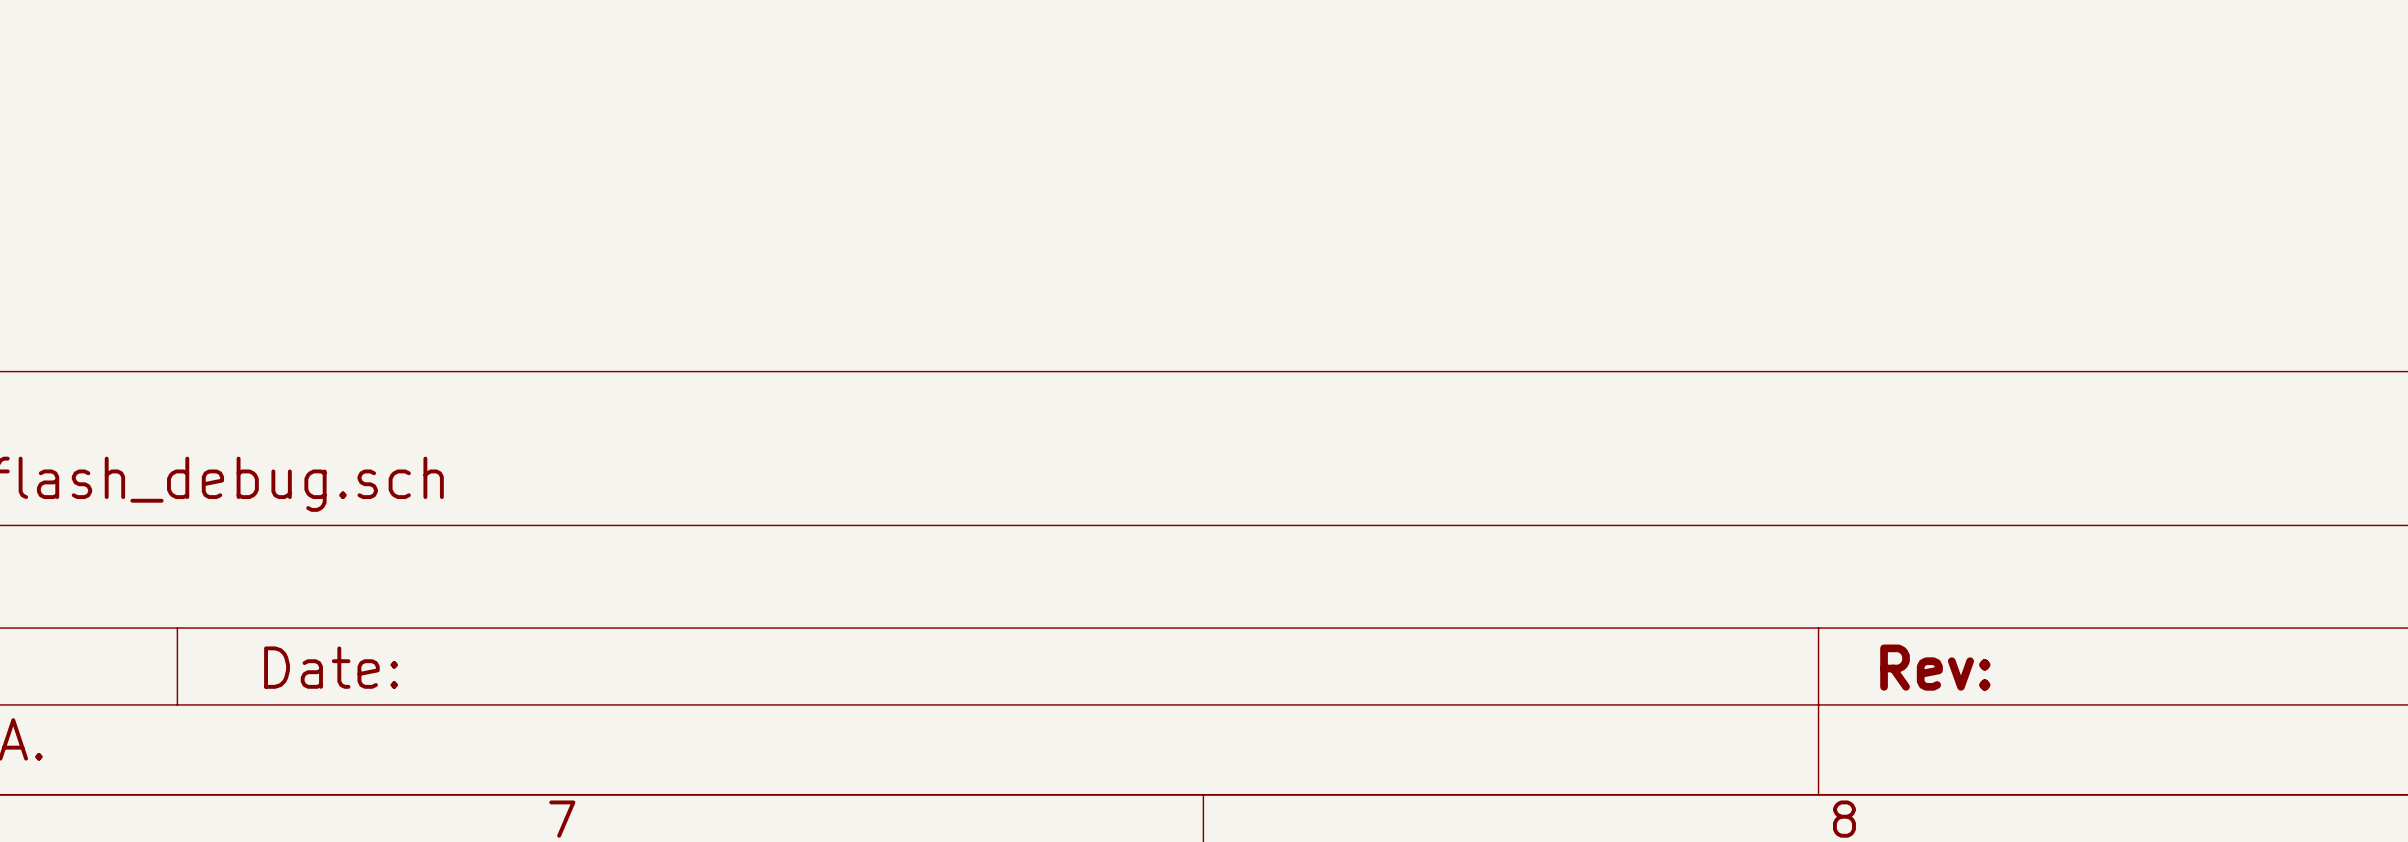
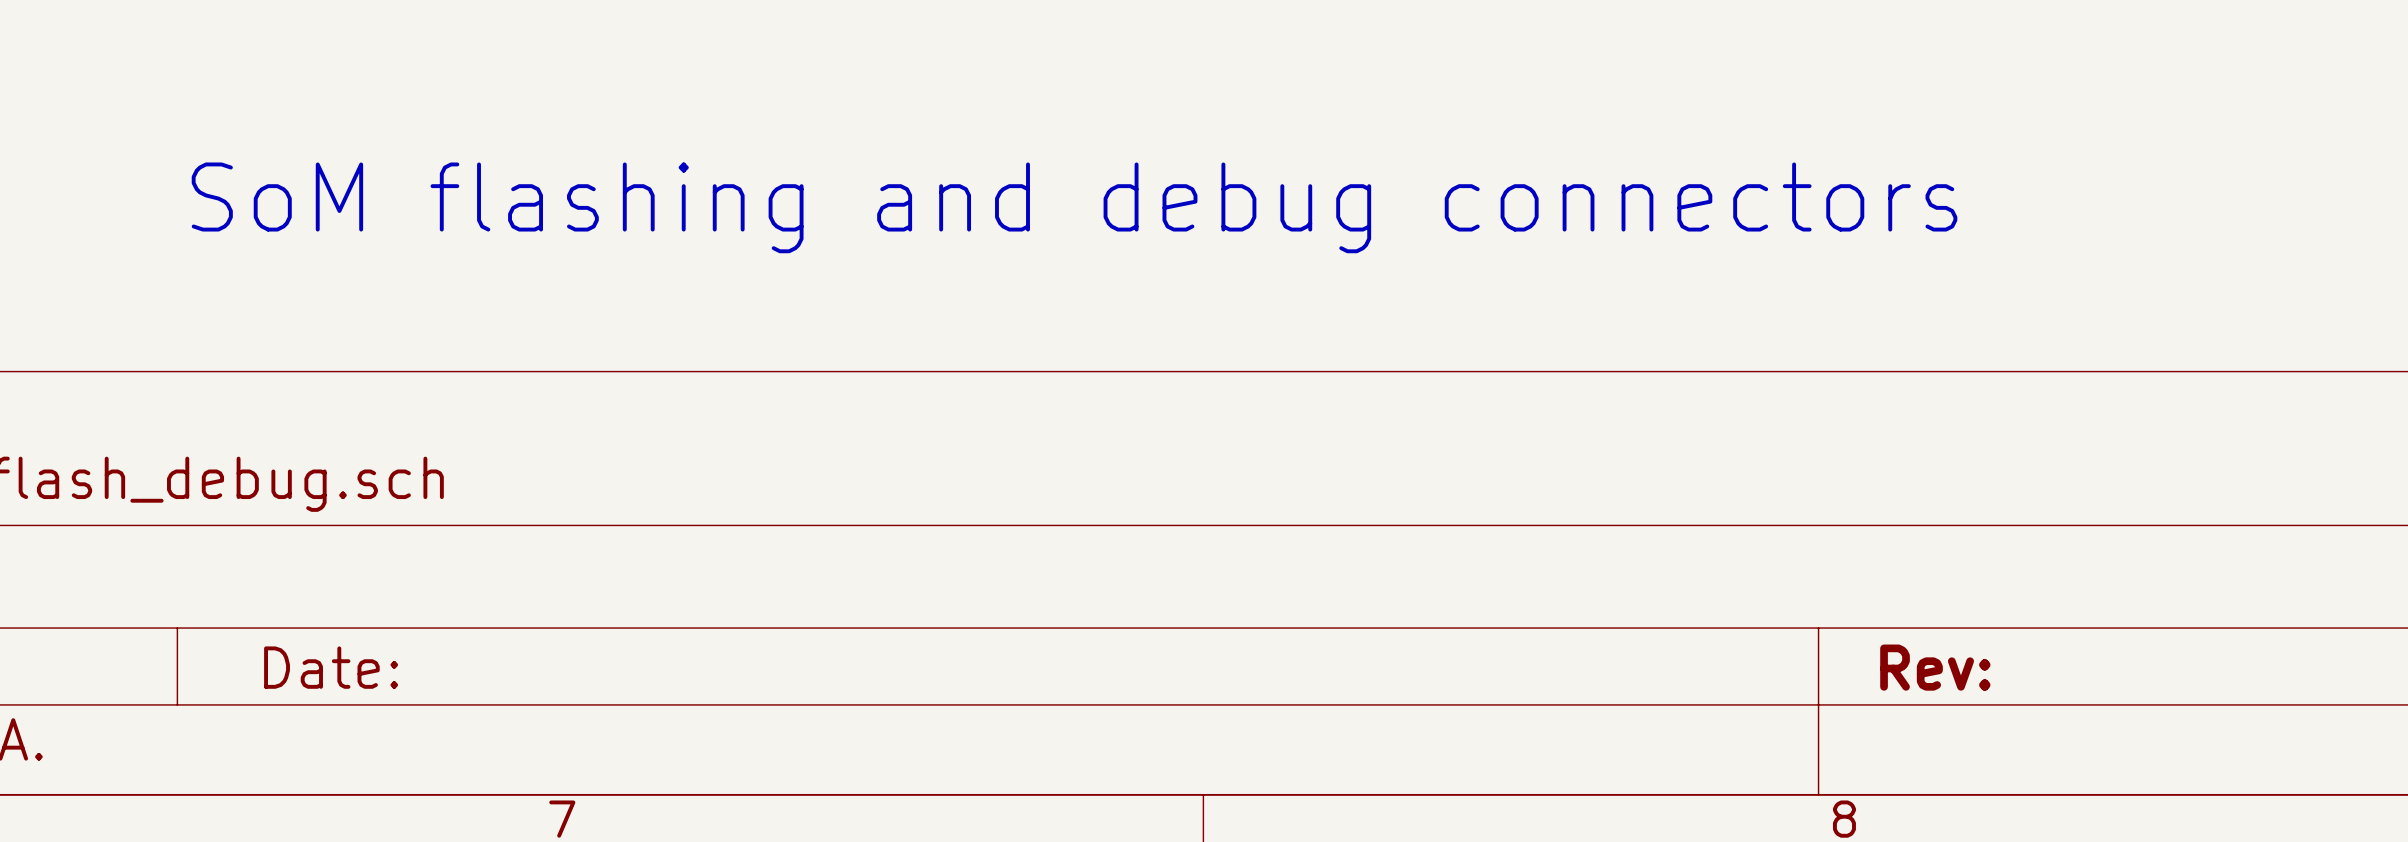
text: none -> SoM flashing and debug connectors (1074, 207)

